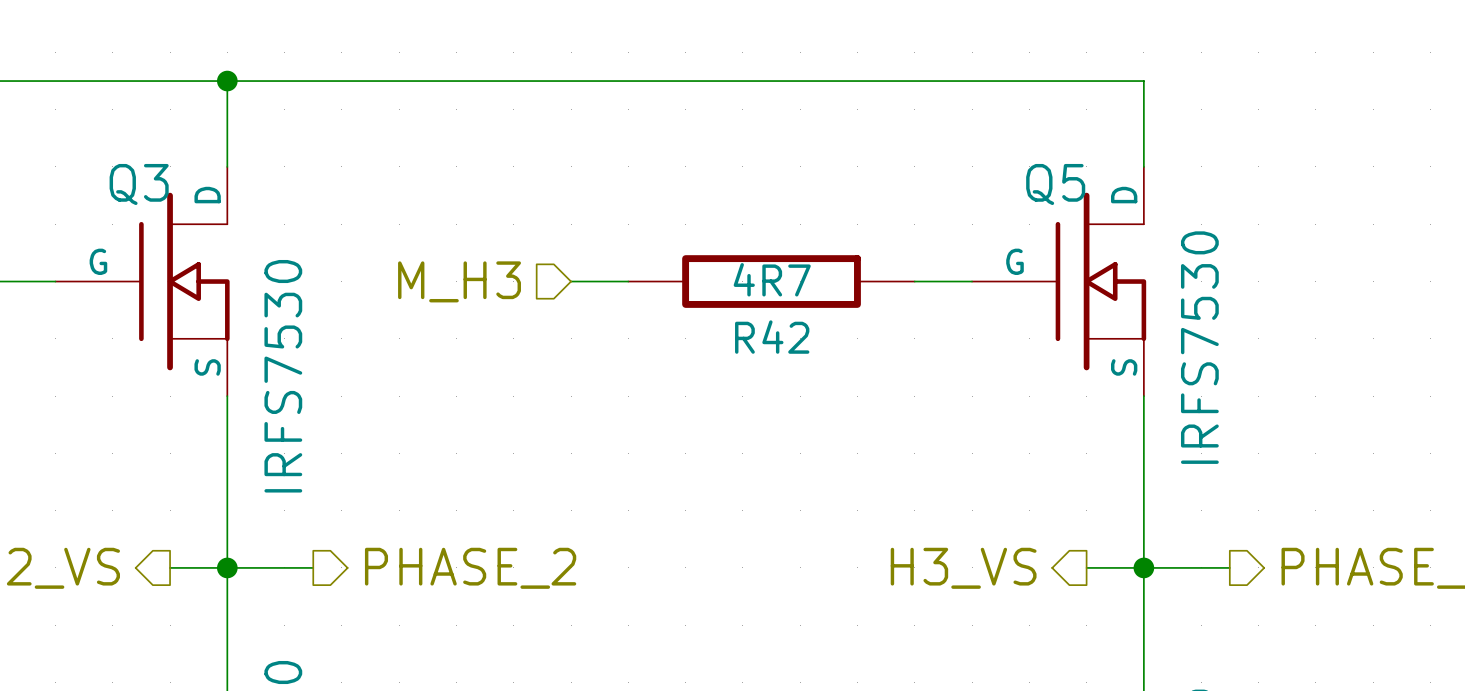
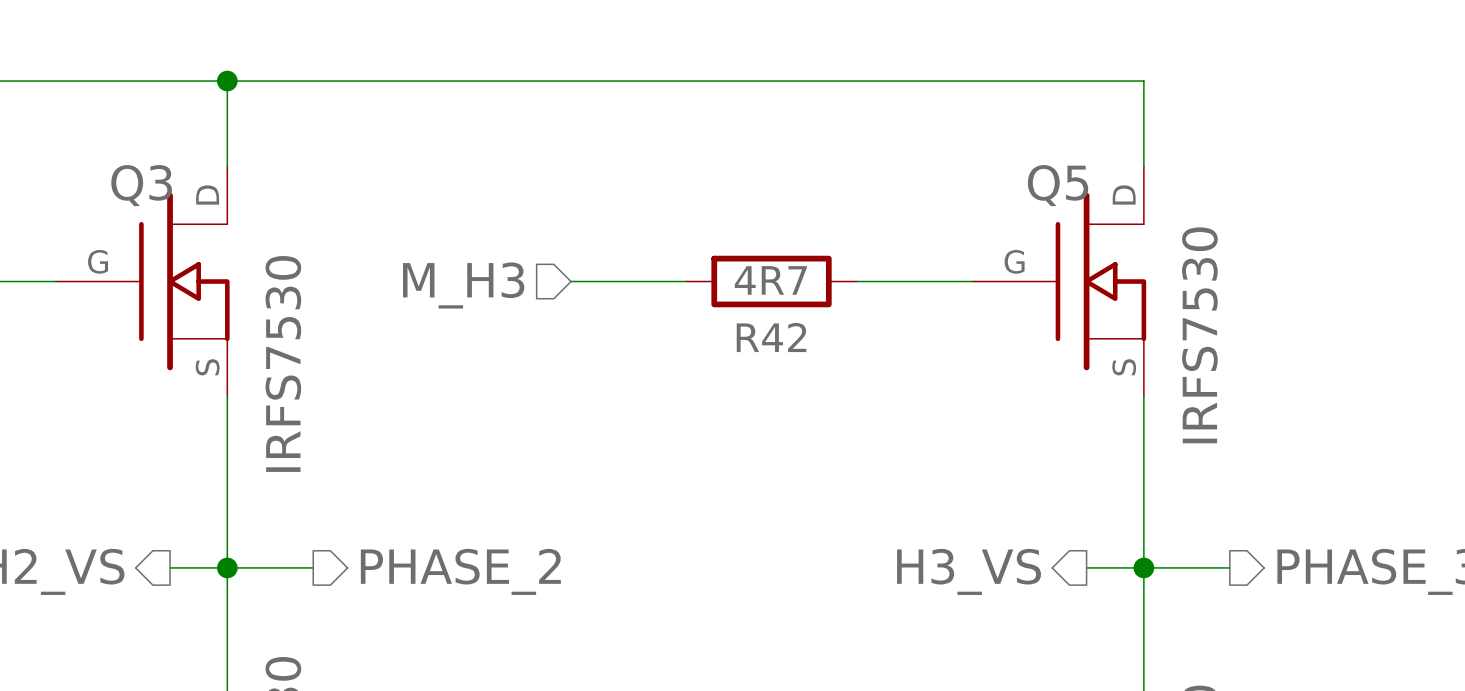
R42 symbol: [628, 255, 915, 308] -> [685, 255, 858, 308]

